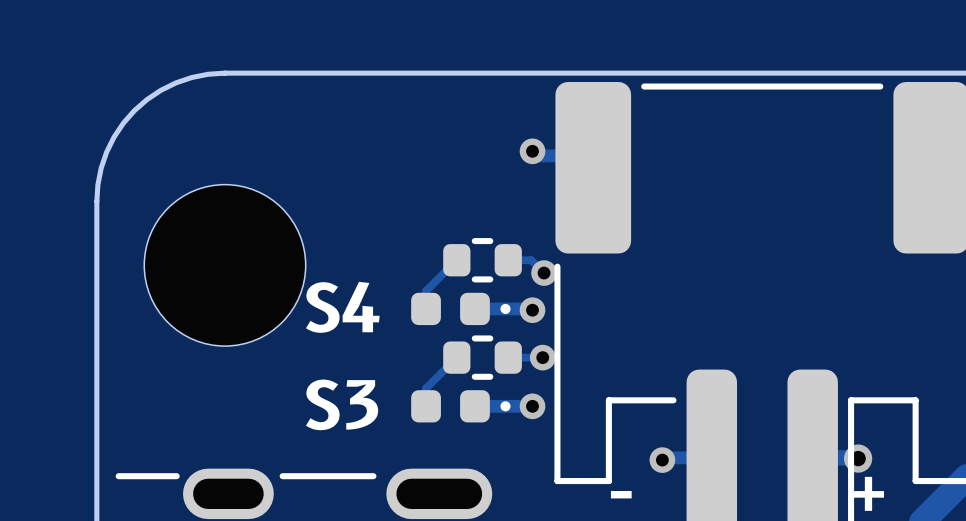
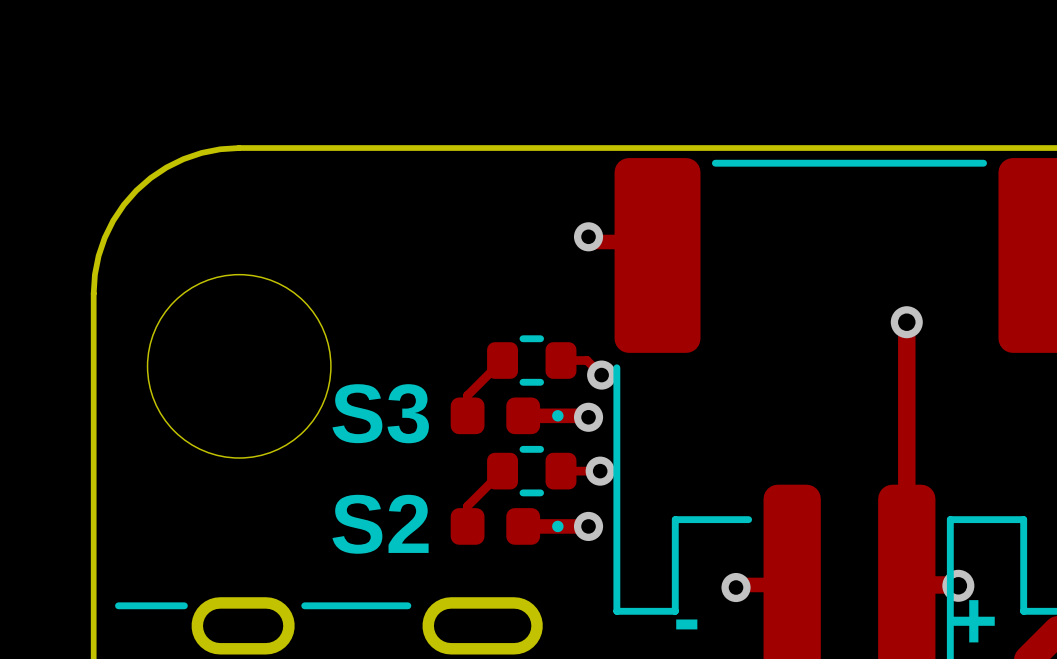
track: none -> (906, 322) (906, 584)
via: none -> (906, 322)
text: S4 (342, 307) -> S3 (380, 413)
text: S3 (342, 404) -> S2 (380, 524)

